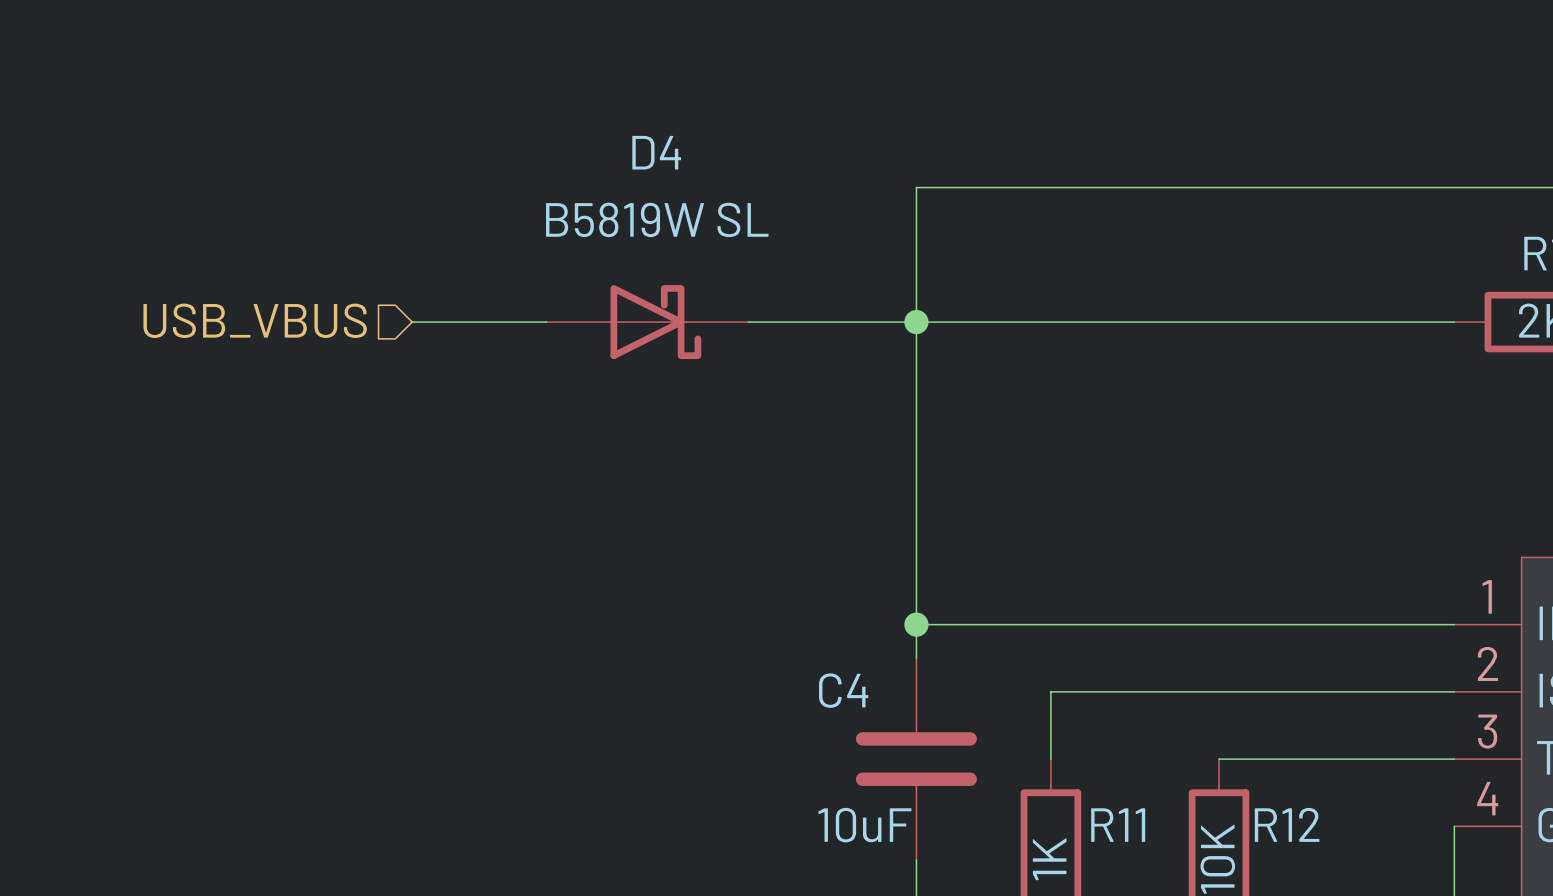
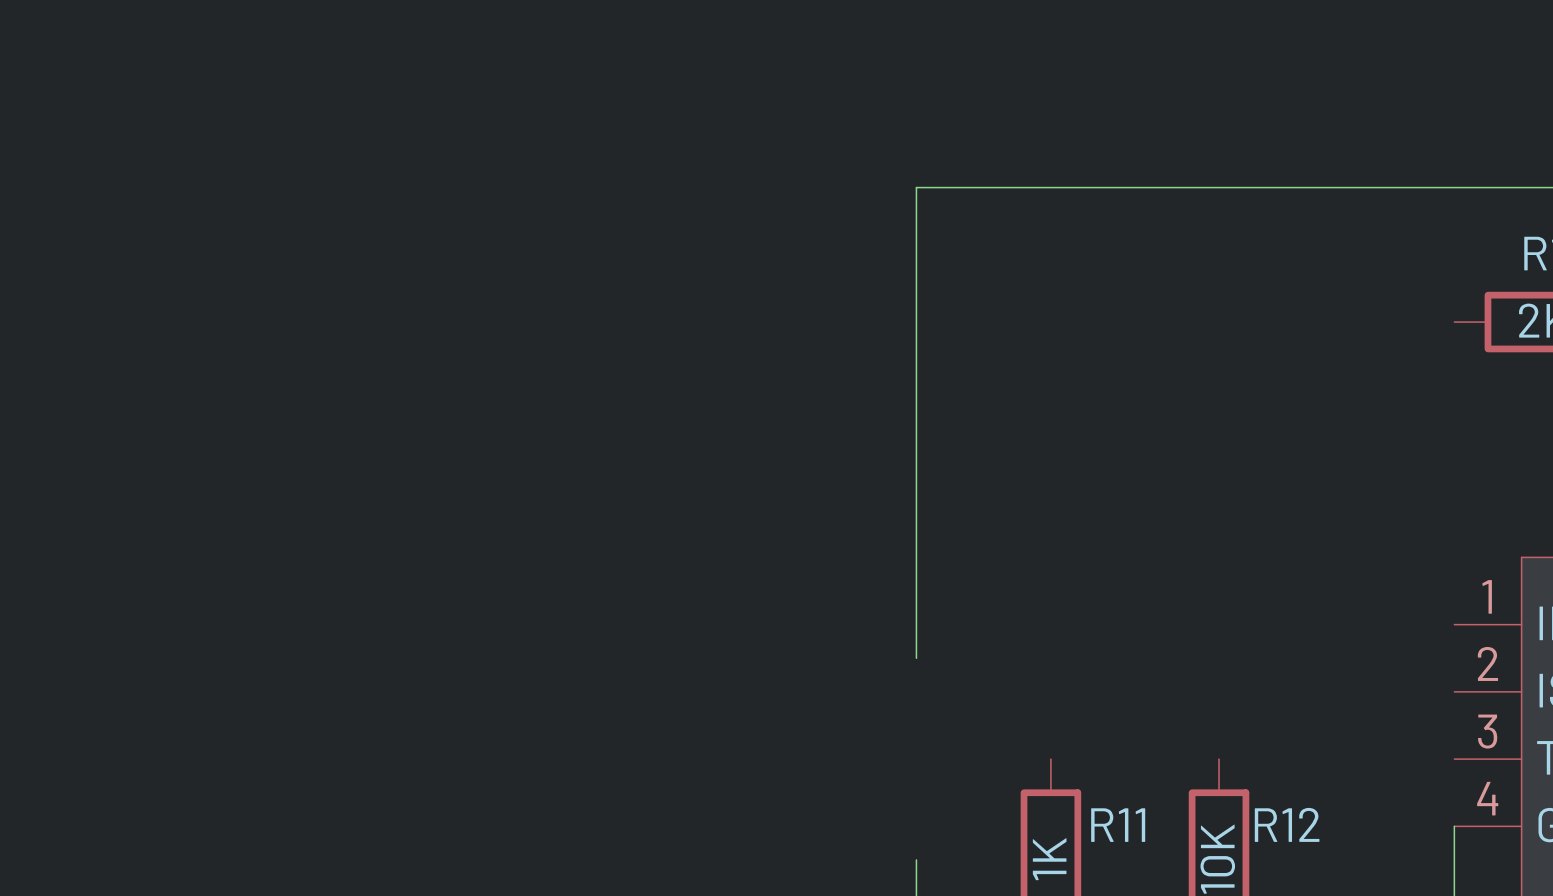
hierarchical label: USB_VBUS (255, 320) -> none
wire: (412, 322) (546, 322) -> none
D4: B5819W SL (647, 322) -> none
wire: (748, 322) (1454, 322) -> none
junction: (916, 322) -> none
wire: (916, 624) (1454, 624) -> none
junction: (916, 624) -> none
wire: (1454, 691) (1050, 691) (1050, 759) -> none
C4: 10uF (916, 759) -> none
wire: (1219, 759) (1454, 759) -> none

